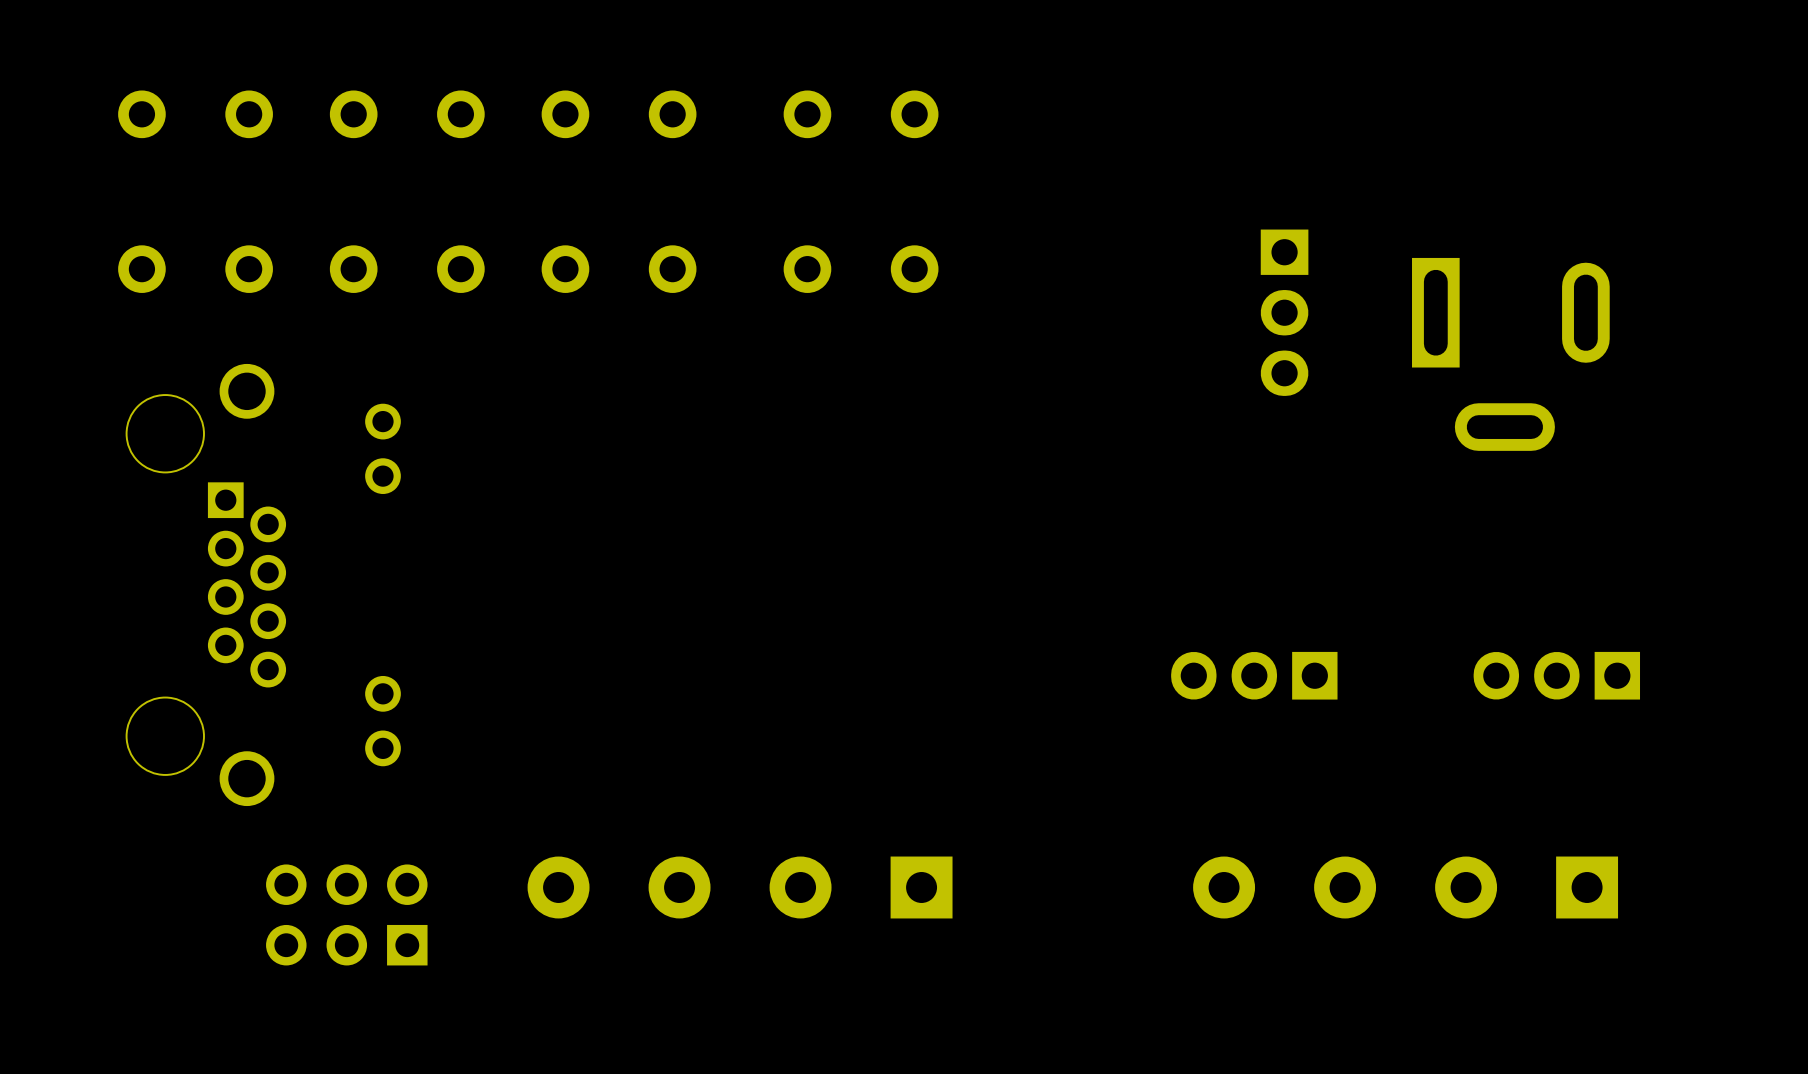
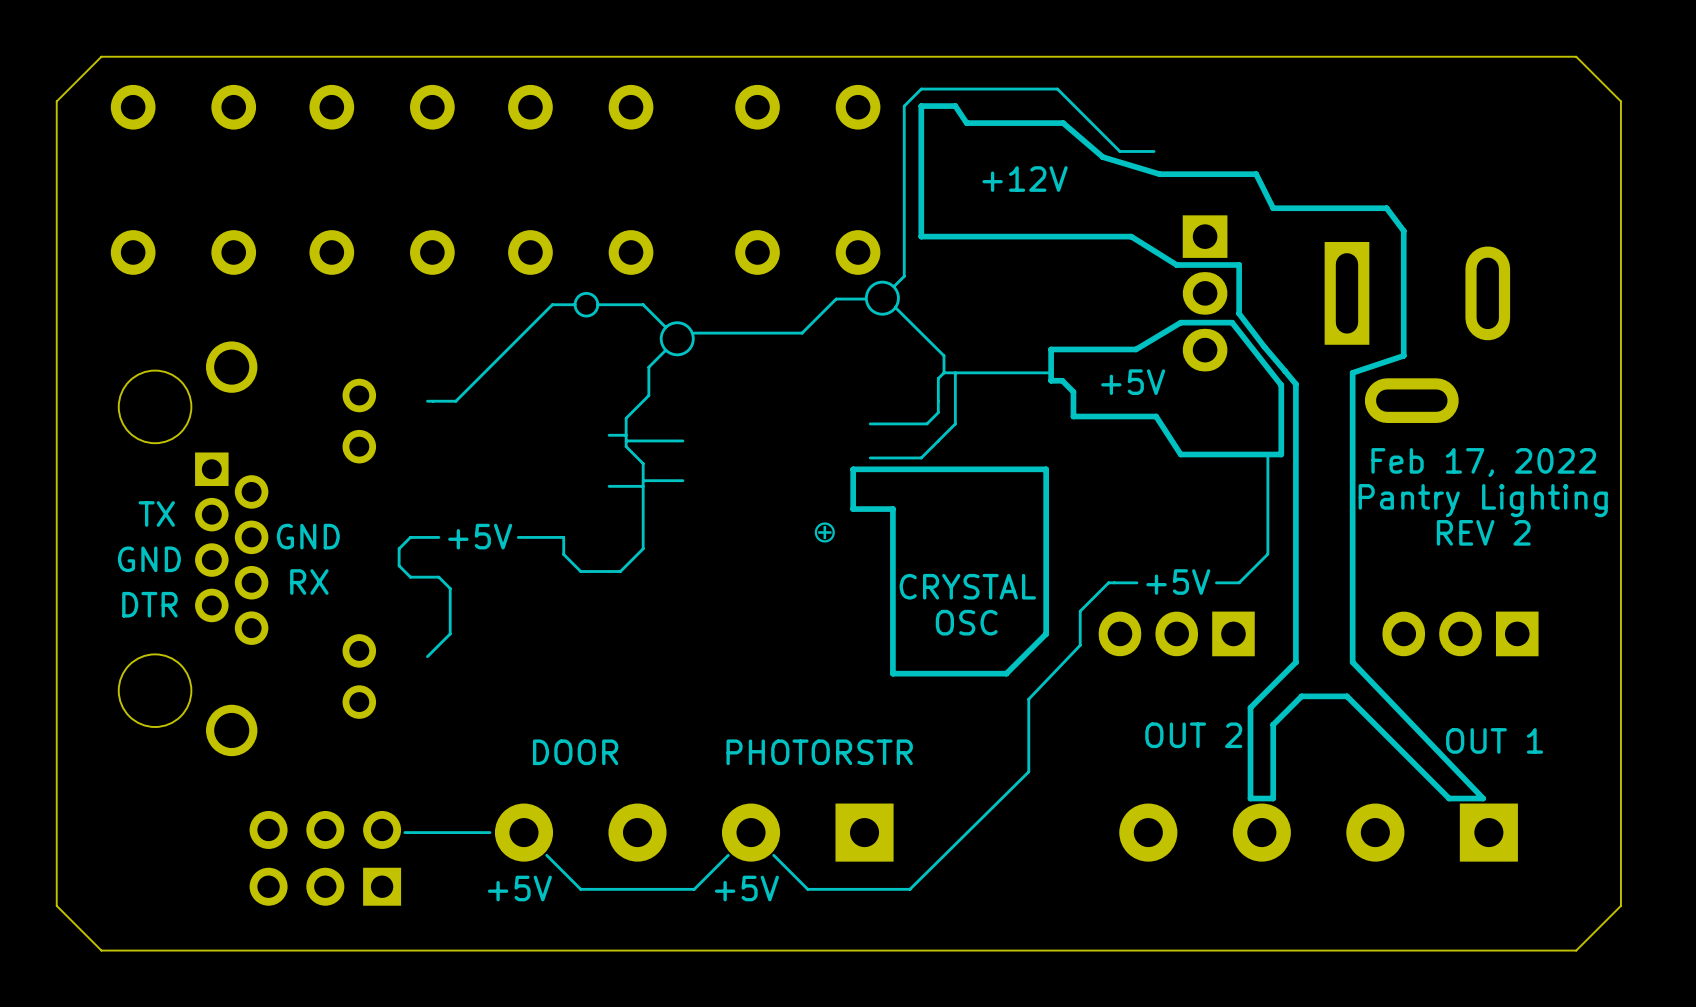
board edge: none -> (1576, 56) (101, 56) (56, 101) (56, 905) (101, 950) (1576, 950) (1620, 905) (1620, 101) (1576, 56)
line: none -> (955, 106) (966, 123) (1063, 123) (1102, 157) (1159, 174) (1256, 174) (1273, 208) (1386, 208) (1403, 230) (1403, 355) (1352, 372) (1352, 662) (1483, 798) (1449, 798) (1346, 696) (1301, 696) (1273, 724) (1273, 798) (1250, 798) (1250, 707) (1295, 662) (1295, 384) (1239, 313) (1239, 265) (1176, 265) (1131, 236) (921, 236) (921, 106) (955, 106)
line: none -> (1154, 151) (1119, 151) (1057, 89) (921, 89) (904, 106) (904, 276) (893, 286)
text: none -> +12V (1025, 179)
drawing: none -> [864, 280, 900, 316]
drawing: none -> [573, 291, 600, 318]
line: none -> (864, 299) (836, 299) (802, 333) (694, 333)
line: none -> (575, 304) (552, 304) (455, 401) (427, 401)
line: none -> (597, 304) (643, 304) (665, 327)
line: none -> (895, 307) (944, 355) (944, 372)
drawing: none -> [659, 321, 695, 357]
line: none -> (1232, 322) (1281, 385) (1281, 454) (1180, 454) (1156, 416) (1073, 416) (1073, 391) (1062, 380) (1051, 380) (1051, 349) (1136, 349) (1180, 322) (1232, 322)
line: none -> (665, 350) (648, 367) (648, 395) (626, 418) (626, 446) (643, 463) (643, 548) (620, 571) (580, 571) (563, 554) (563, 537) (518, 537)
line: none -> (944, 372) (938, 378) (938, 412) (926, 423) (870, 423)
line: none -> (955, 372) (955, 423) (921, 457) (870, 457)
line: none -> (1048, 372) (944, 372)
text: none -> +5V (1133, 382)
line: none -> (626, 435) (609, 435)
line: none -> (682, 440) (626, 440)
line: none -> (1267, 456) (1267, 553)
text: none -> Feb 17, 2022 (1483, 462)
line: none -> (1046, 469) (1046, 633) (1006, 673) (892, 673) (892, 509) (853, 509) (853, 469) (1046, 469)
line: none -> (682, 480) (643, 480)
line: none -> (643, 486) (609, 486)
text: none -> Pantry Lighting (1483, 500)
text: none -> TX (156, 513)
text: none -> ⊕ (824, 532)
text: none -> REV 2 (1483, 532)
text: none -> GND (308, 536)
line: none -> (438, 537) (410, 537) (399, 548) (399, 565) (410, 577) (438, 577) (450, 588) (450, 633) (427, 656)
text: none -> +5V (480, 536)
line: none -> (1267, 554) (1239, 582) (1216, 582)
text: none -> GND (149, 559)
text: none -> RX (309, 582)
text: none -> +5V (1178, 582)
line: none -> (1136, 582) (1108, 582) (1080, 611) (1080, 645) (1028, 699) (1028, 771) (909, 889) (807, 889) (773, 855)
text: none -> CRYSTAL (967, 586)
text: none -> DTR (149, 604)
text: none -> OSC (966, 622)
text: none -> OUT 2 (1193, 735)
text: none -> OUT 1 (1494, 740)
text: none -> DOOR (575, 752)
text: none -> PHOTORSTR (819, 752)
line: none -> (489, 832) (404, 832)
line: none -> (728, 855) (694, 889) (580, 889) (546, 855)
text: none -> +5V (519, 888)
text: none -> +5V (746, 888)

